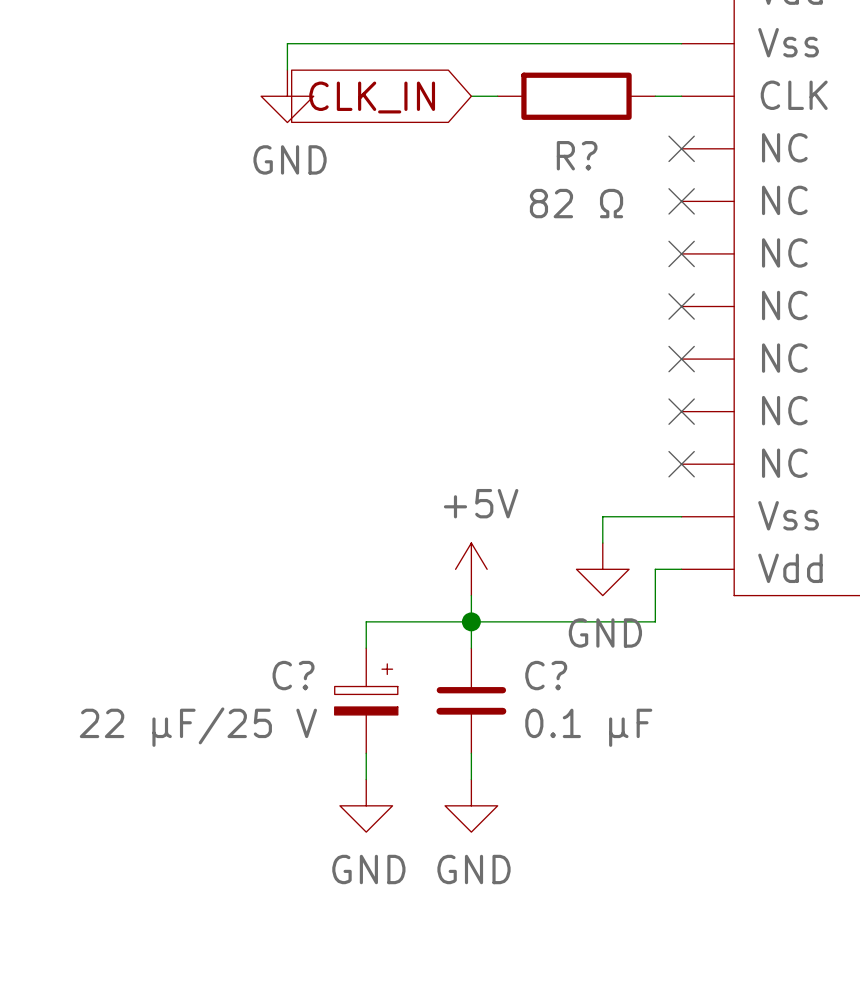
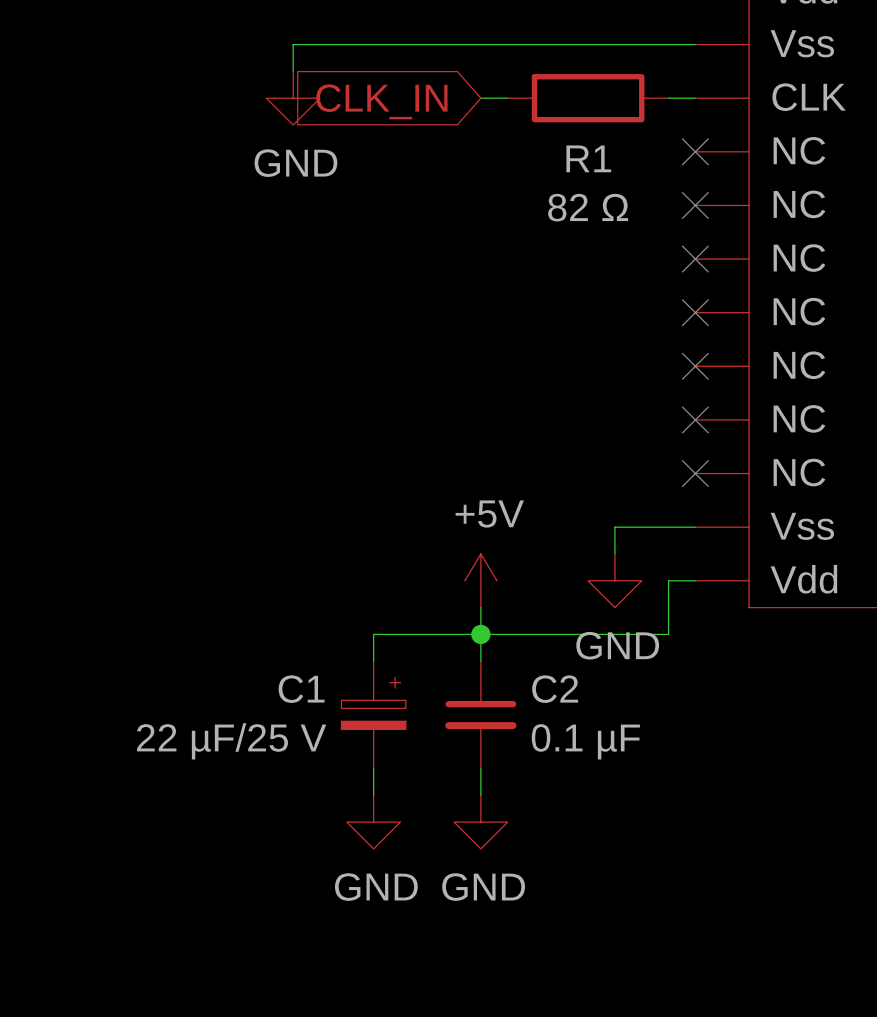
R? name: R? (577, 155) -> R1 (588, 158)
C? name: C? (293, 675) -> C1 (301, 689)
C? name: C? (546, 675) -> C2 (555, 689)

